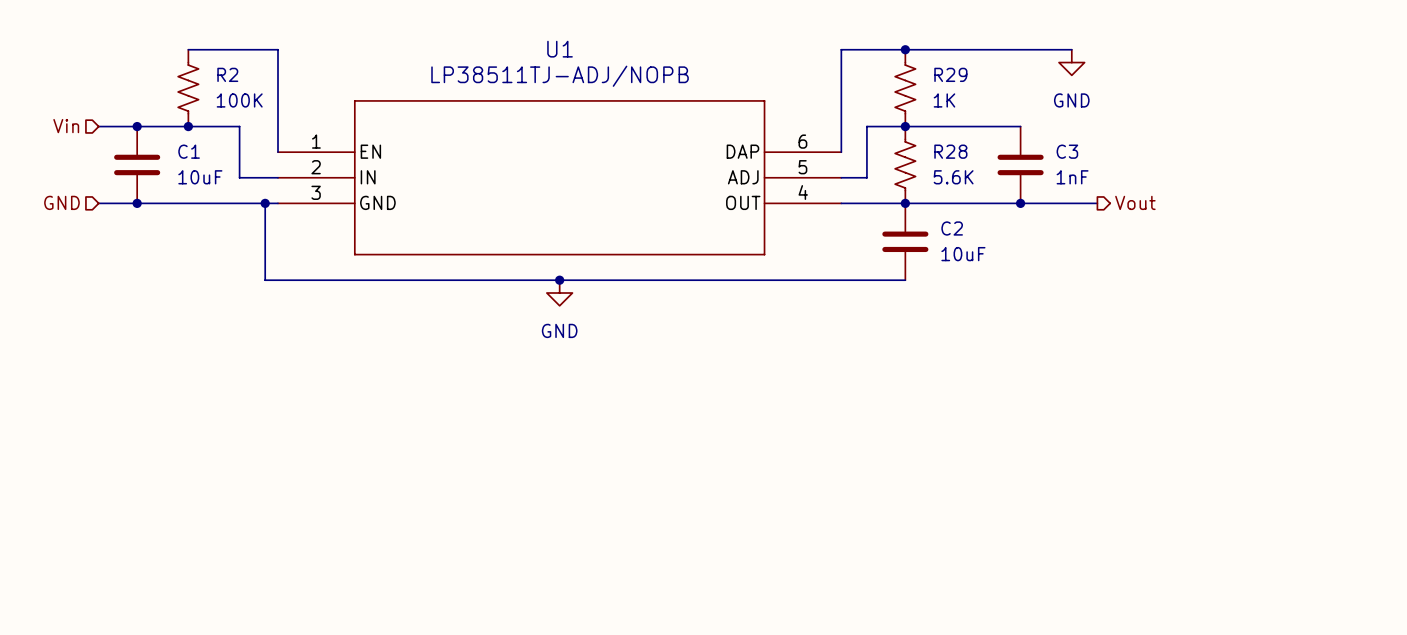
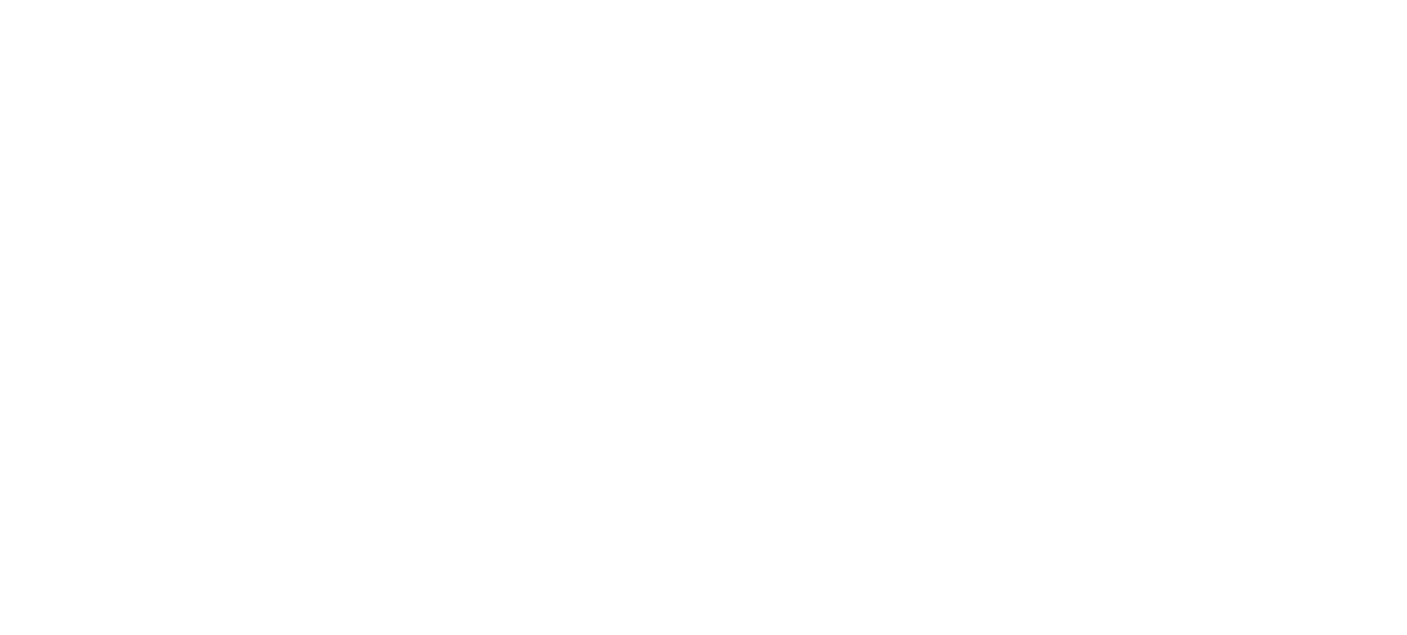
wire: (188, 49) (278, 49) (278, 152) -> none
junction: (905, 49) -> none
wire: (1071, 49) (841, 49) (841, 152) -> none
power symbol: GND (1071, 62) -> none
R2: 100K (188, 88) -> none
R29: 1K (905, 88) -> none
hierarchical label: Vin (66, 126) -> none
wire: (98, 126) (239, 126) (239, 177) (278, 177) -> none
junction: (137, 126) -> none
junction: (188, 126) -> none
junction: (905, 126) -> none
wire: (1020, 126) (866, 126) (866, 177) (841, 177) -> none
C1: 10uF (137, 164) -> none
R28: 5.6K (905, 164) -> none
C3: 1nF (1020, 164) -> none
U1: LP38511TJ-ADJ/NOPB (559, 177) -> none
hierarchical label: GND (61, 202) -> none
hierarchical label: Vout (1135, 202) -> none
wire: (98, 203) (278, 203) -> none
junction: (137, 203) -> none
wire: (265, 203) (265, 280) (905, 280) -> none
junction: (265, 203) -> none
wire: (841, 203) (1097, 203) -> none
junction: (905, 203) -> none
junction: (1020, 203) -> none
C2: 10uF (905, 241) -> none
junction: (559, 280) -> none
power symbol: GND (559, 293) -> none

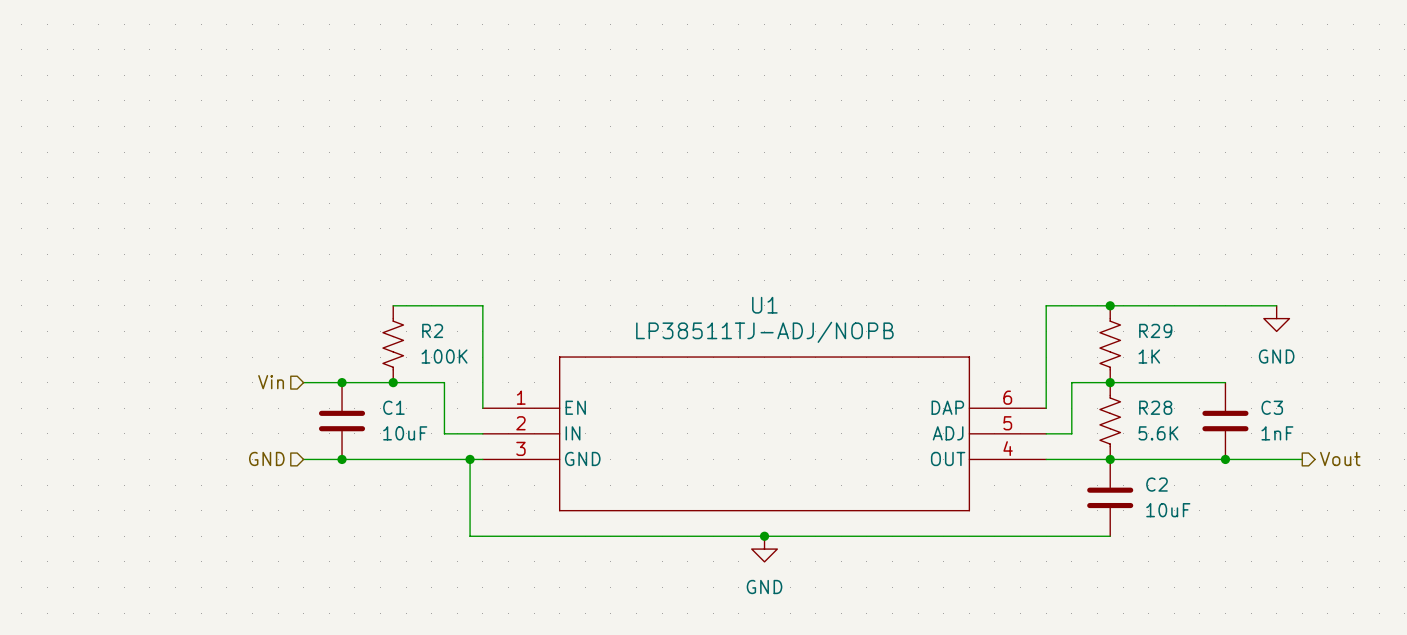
wire: none -> (393, 305) (482, 305) (482, 408)
junction: none -> (1110, 305)
wire: none -> (1276, 305) (1046, 305) (1046, 408)
power symbol: none -> GND (1276, 318)
R2: none -> 100K (393, 344)
R29: none -> 1K (1110, 344)
hierarchical label: none -> Vin (271, 382)
wire: none -> (303, 382) (444, 382) (444, 433) (482, 433)
junction: none -> (342, 382)
junction: none -> (393, 382)
junction: none -> (1110, 382)
wire: none -> (1225, 382) (1071, 382) (1071, 433) (1046, 433)
C1: none -> 10uF (342, 421)
R28: none -> 5.6K (1110, 421)
C3: none -> 1nF (1225, 421)
U1: none -> LP38511TJ-ADJ/NOPB (764, 433)
hierarchical label: none -> GND (266, 458)
hierarchical label: none -> Vout (1340, 458)
wire: none -> (303, 459) (482, 459)
junction: none -> (342, 459)
wire: none -> (470, 459) (470, 536) (1110, 536)
junction: none -> (470, 459)
wire: none -> (1046, 459) (1302, 459)
junction: none -> (1110, 459)
junction: none -> (1225, 459)
C2: none -> 10uF (1110, 497)
junction: none -> (764, 536)
power symbol: none -> GND (764, 549)

